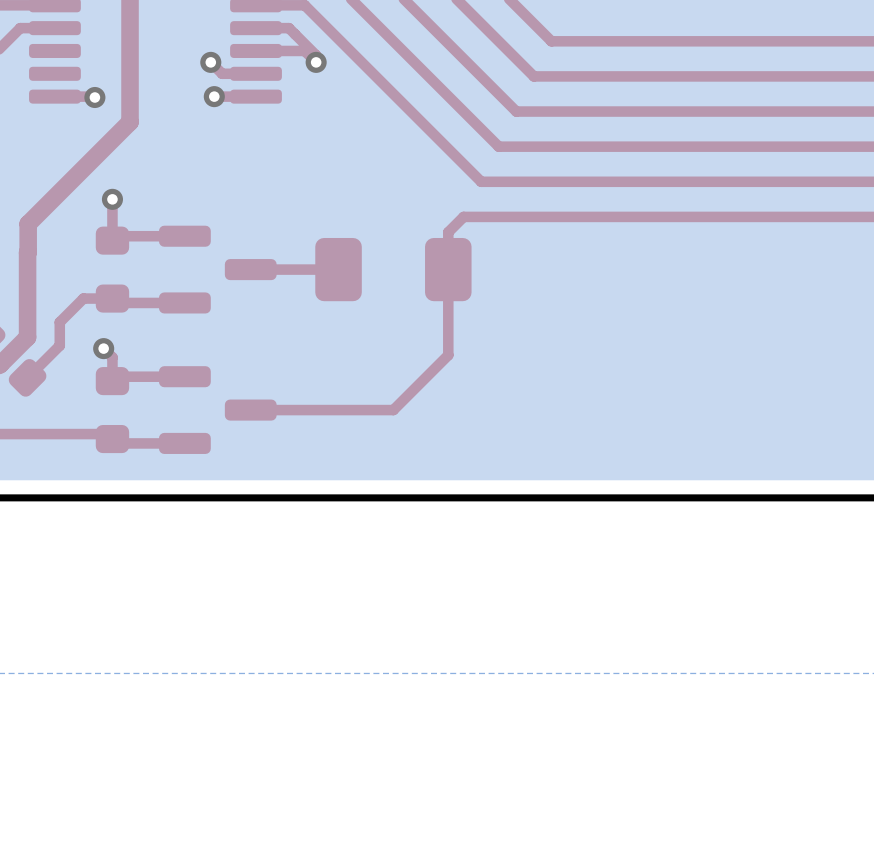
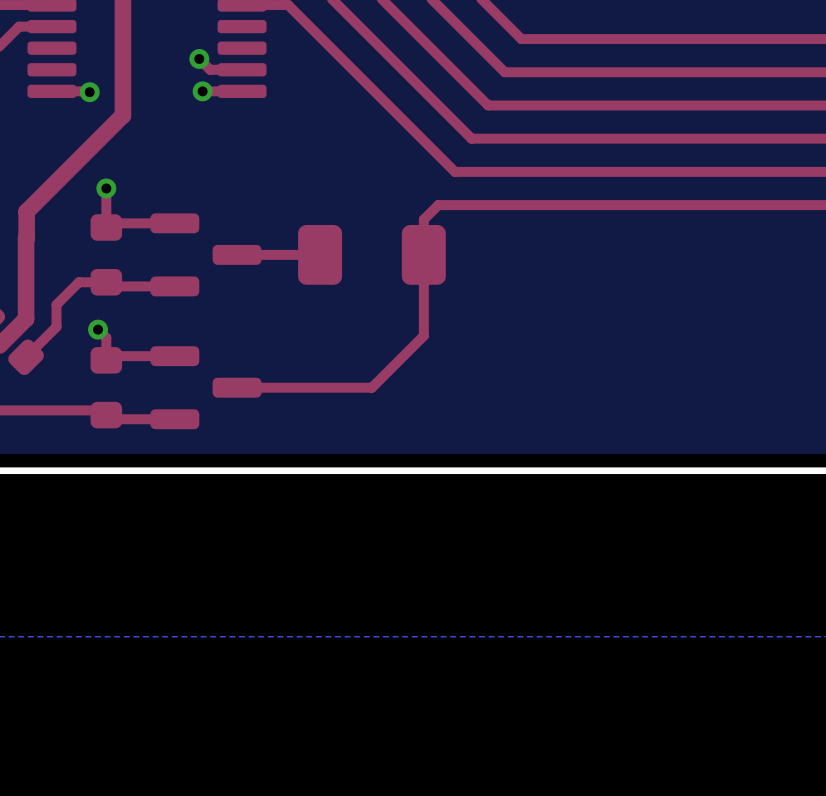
top track: (256, 28) (288, 28) (316, 55) (316, 62) (304, 50) (256, 50) -> none
via: (316, 62) -> none

